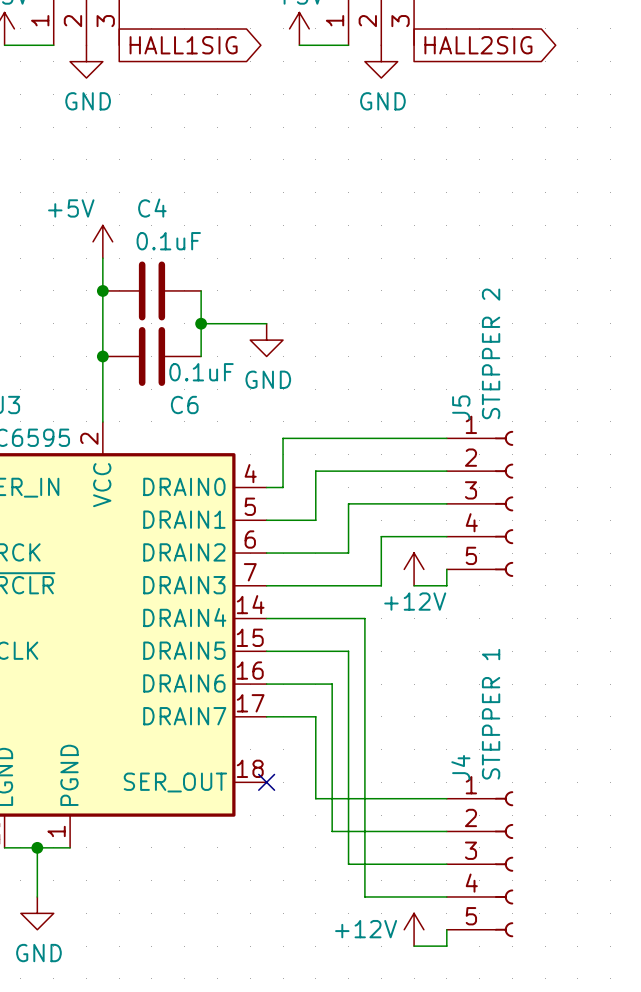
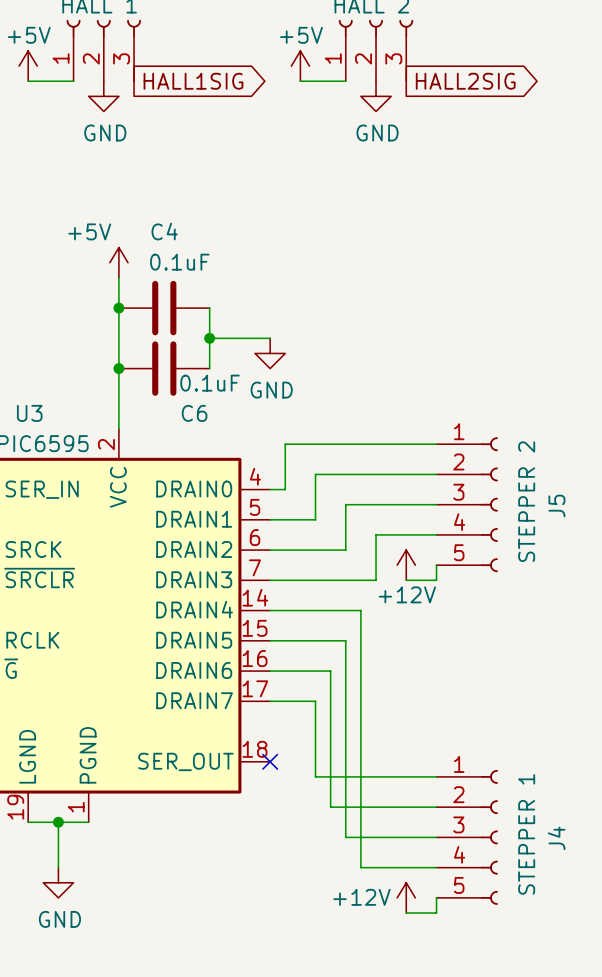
J5 value position: STEPPER 2 (491, 353) -> STEPPER 2 (526, 501)
J5 name position: J5 (461, 407) -> J5 (556, 506)
J4 value position: STEPPER 1 (491, 714) -> STEPPER 1 (526, 834)
J4 name position: J4 (460, 767) -> J4 (556, 838)

